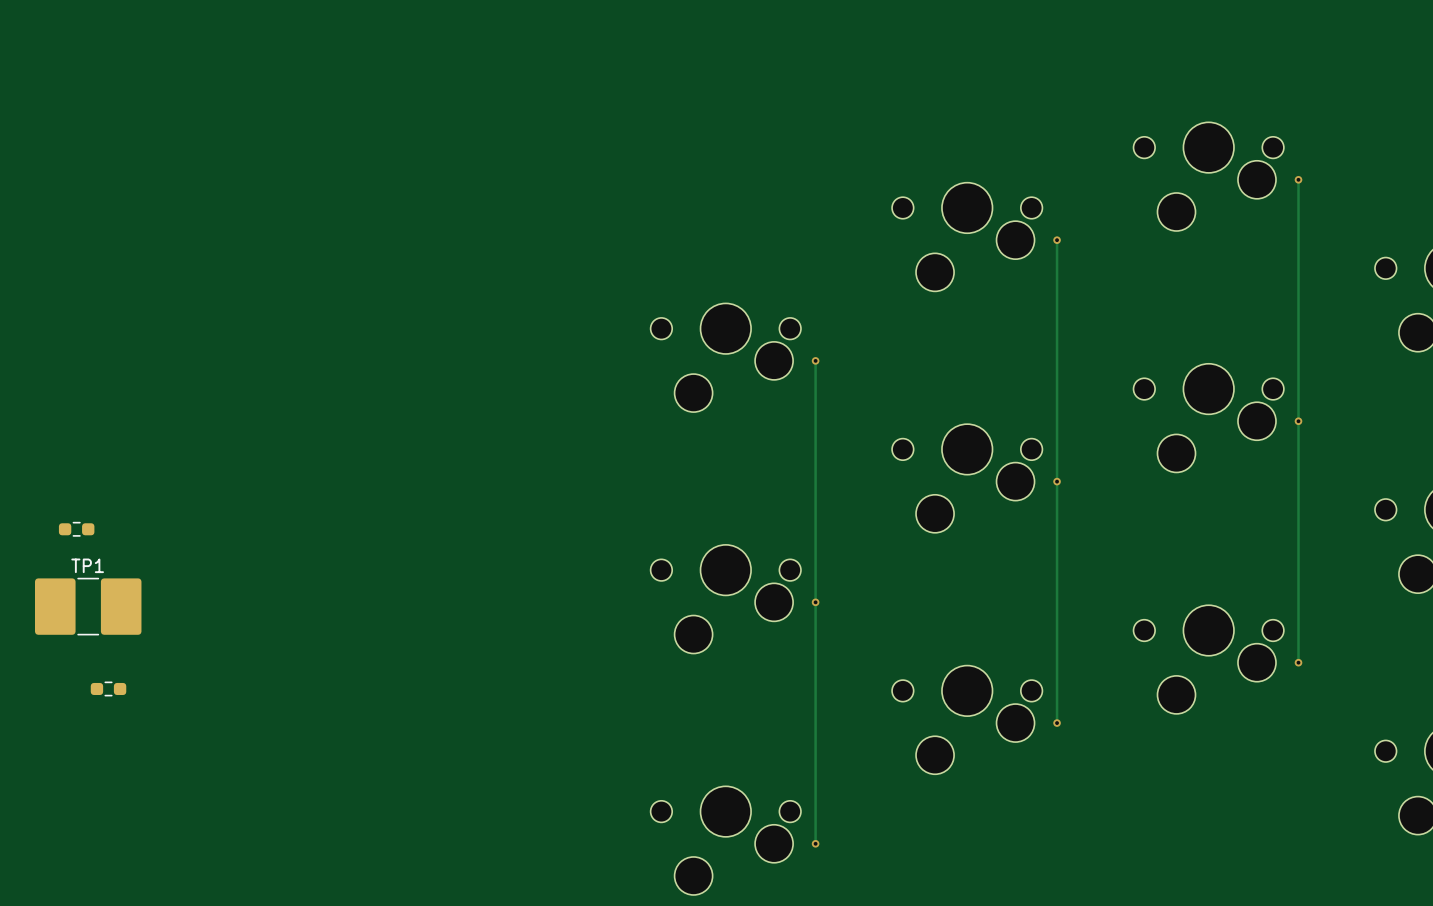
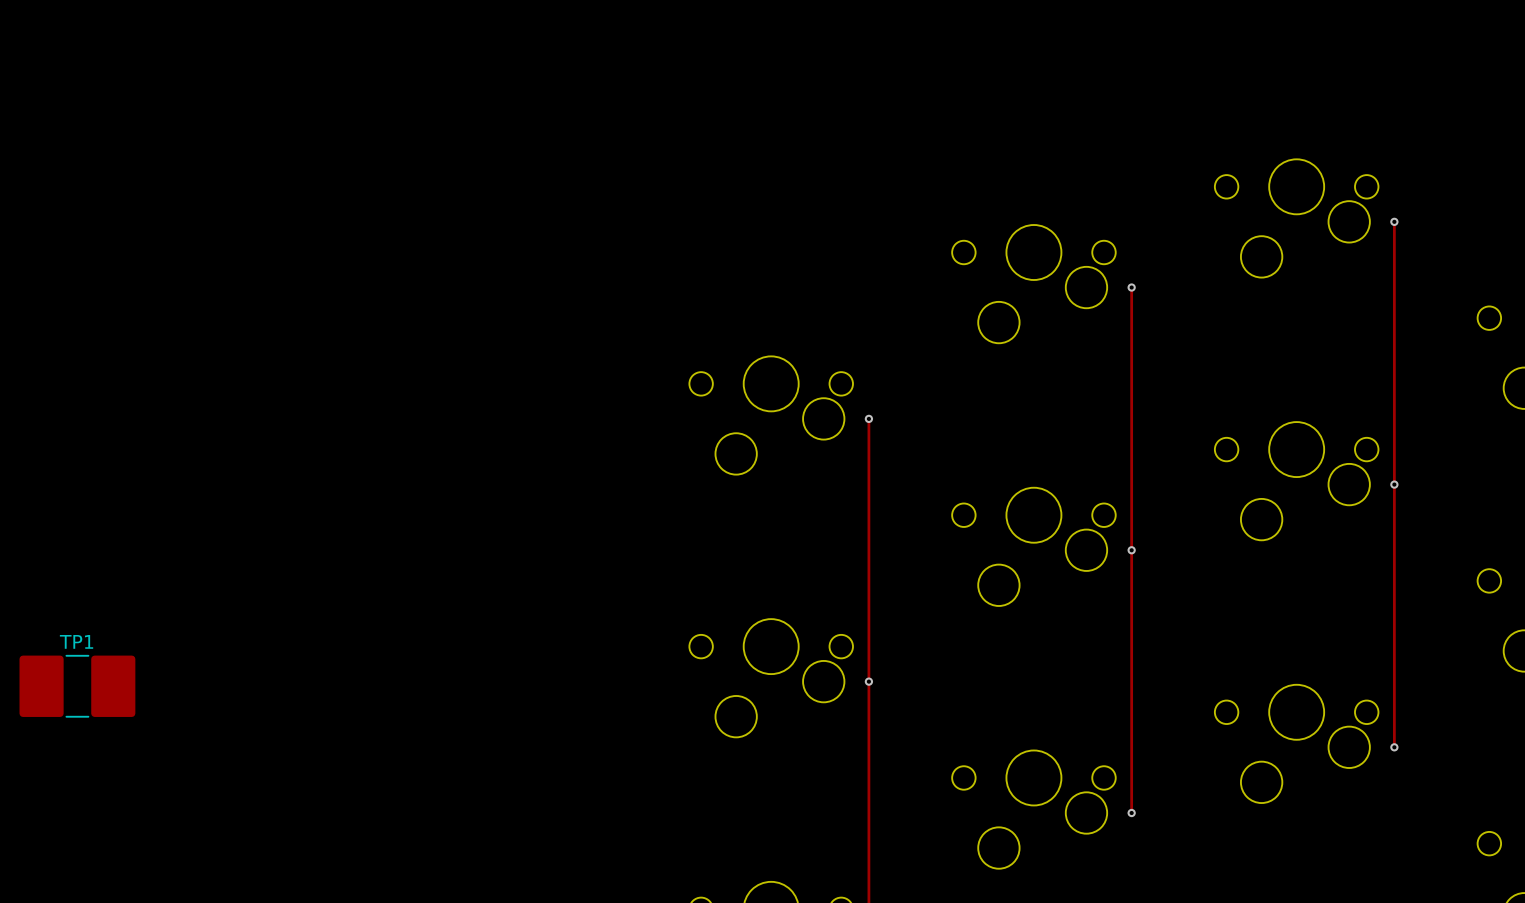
part: (76, 529) -> none
part: (108, 688) -> none

